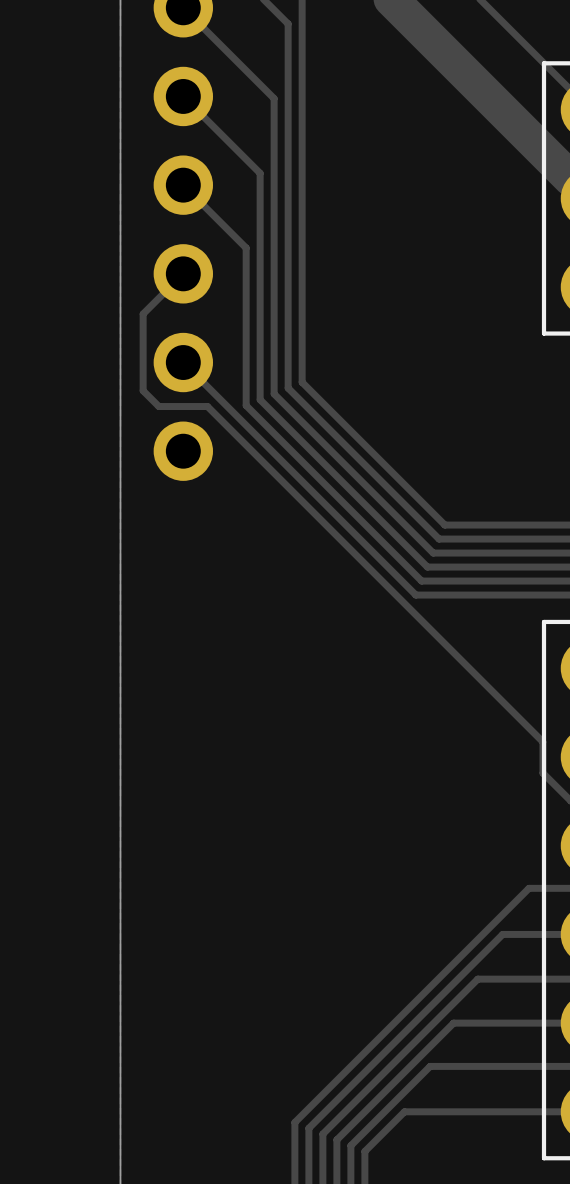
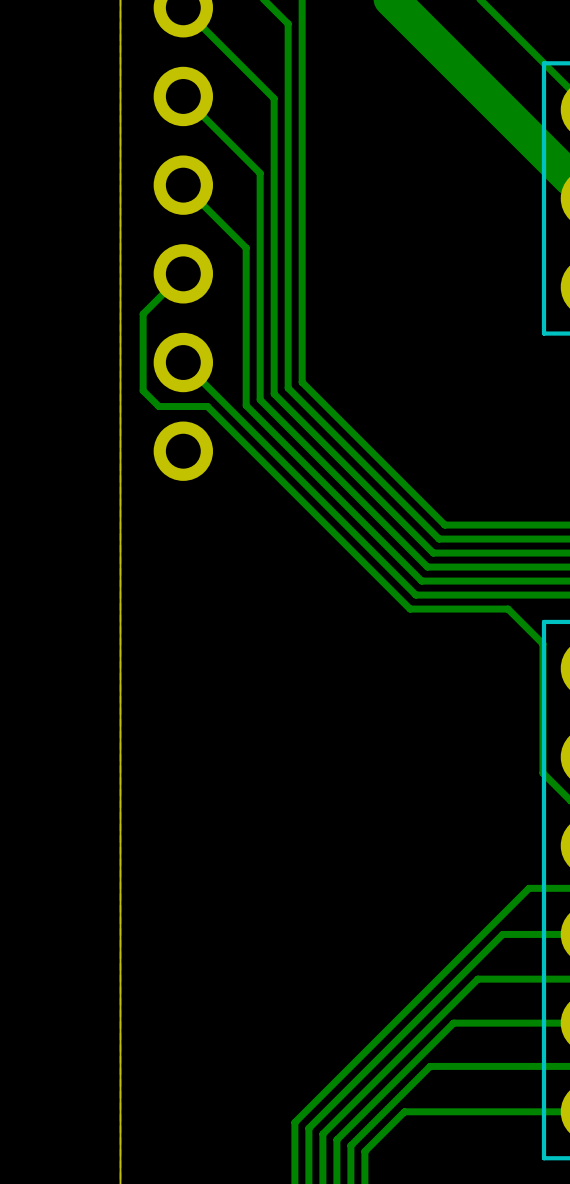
track: (410, 609) (542, 741) -> (410, 609) (508, 609) (542, 643) (542, 741)

